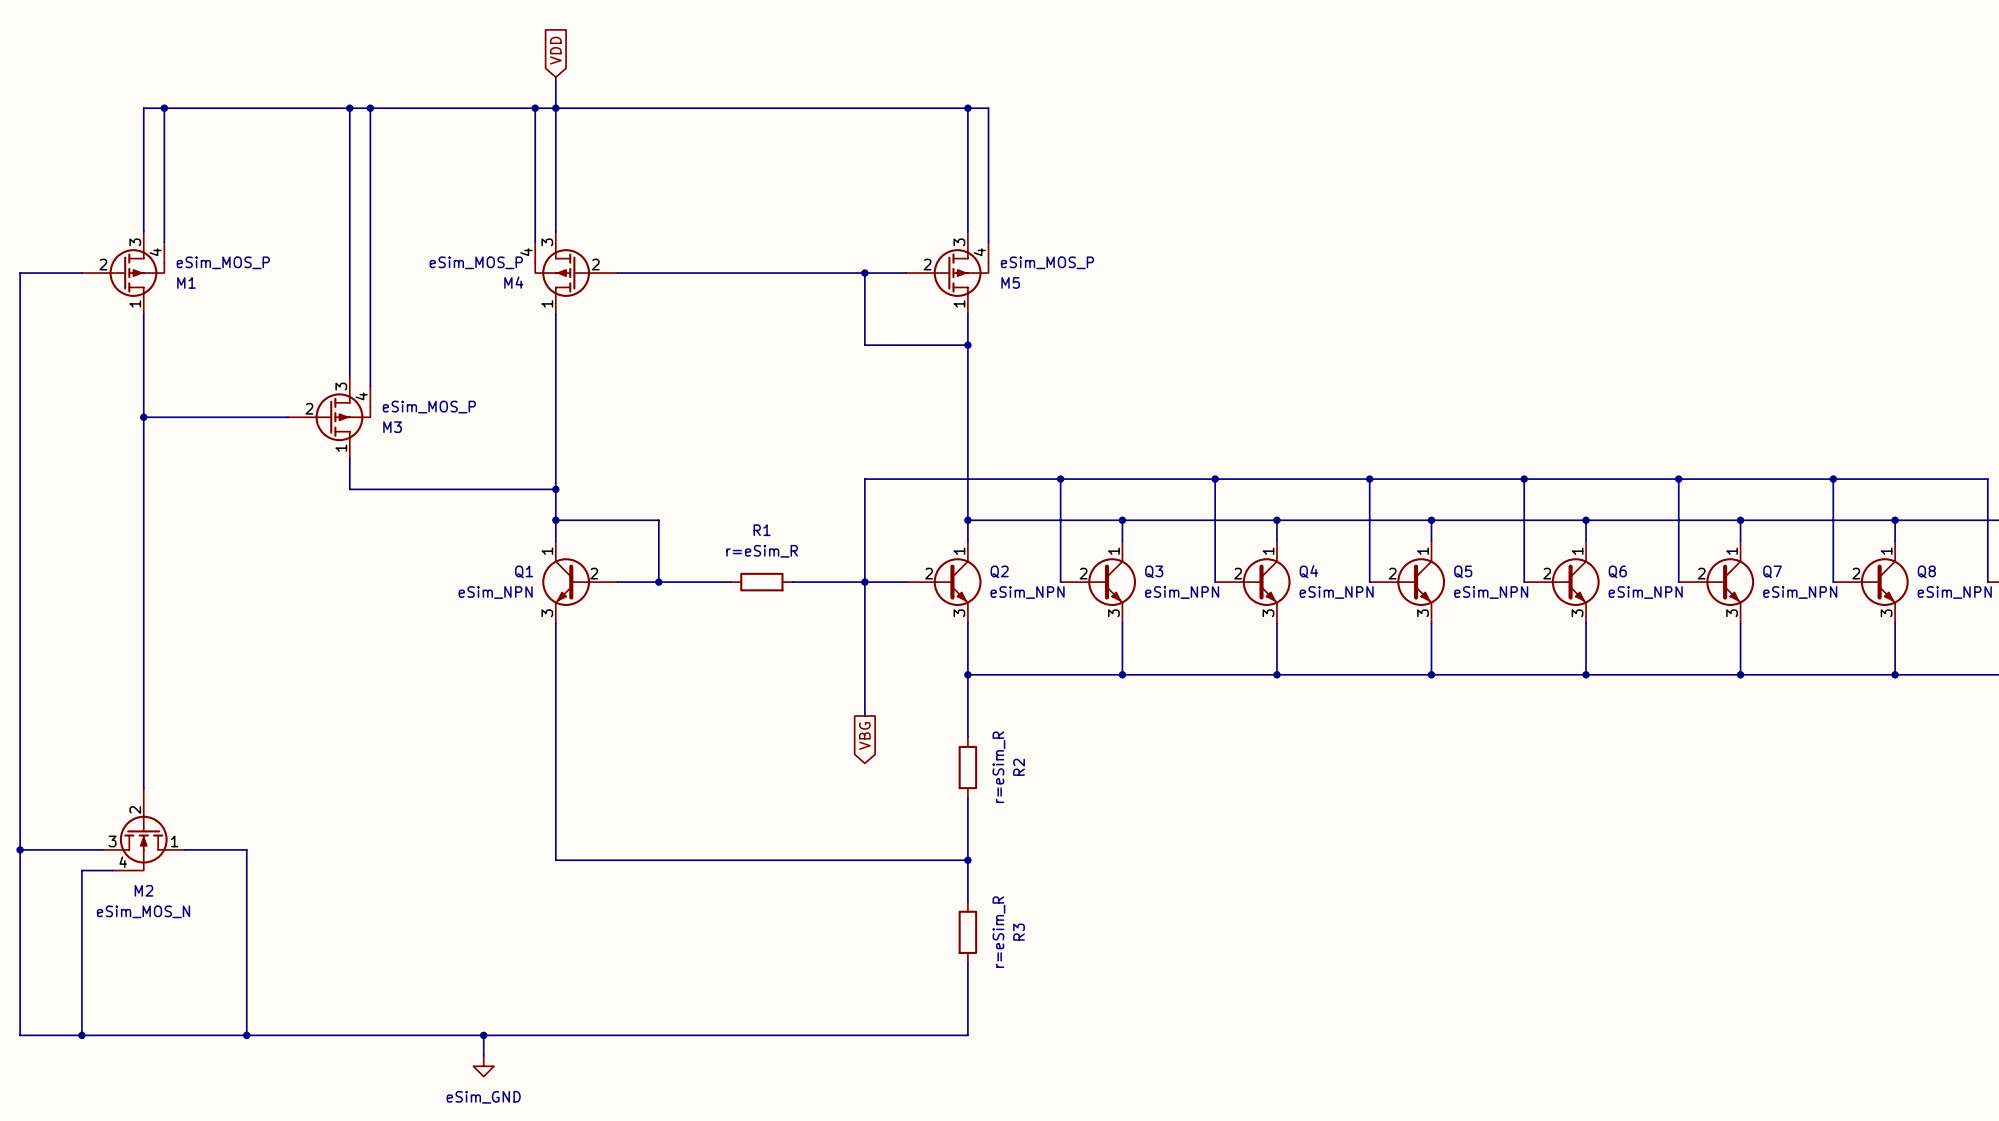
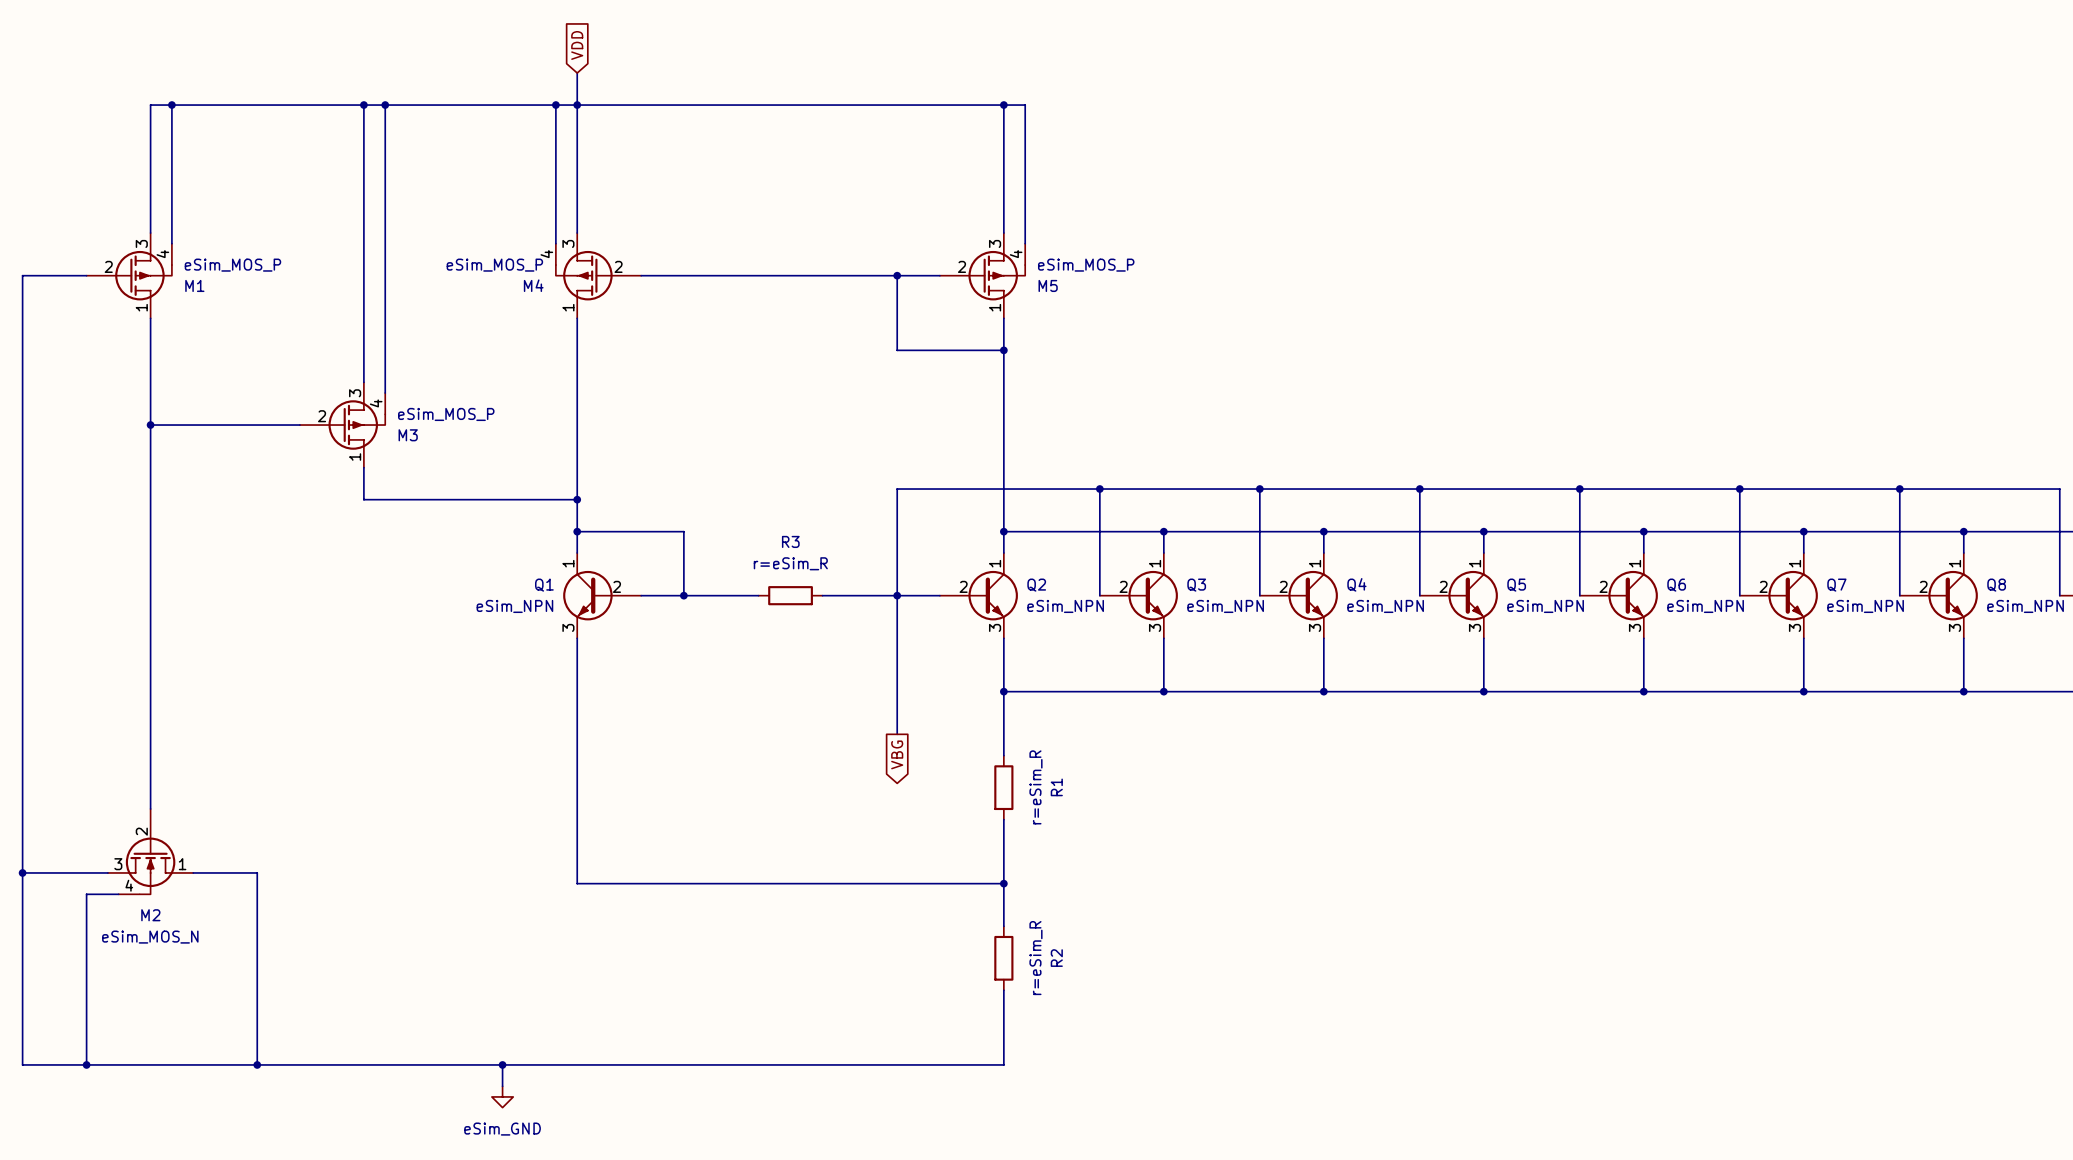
R1 name: R1 (762, 530) -> R3 (790, 541)
R2 name: R2 (1019, 767) -> R1 (1056, 787)
R3 name: R3 (1019, 932) -> R2 (1056, 958)

